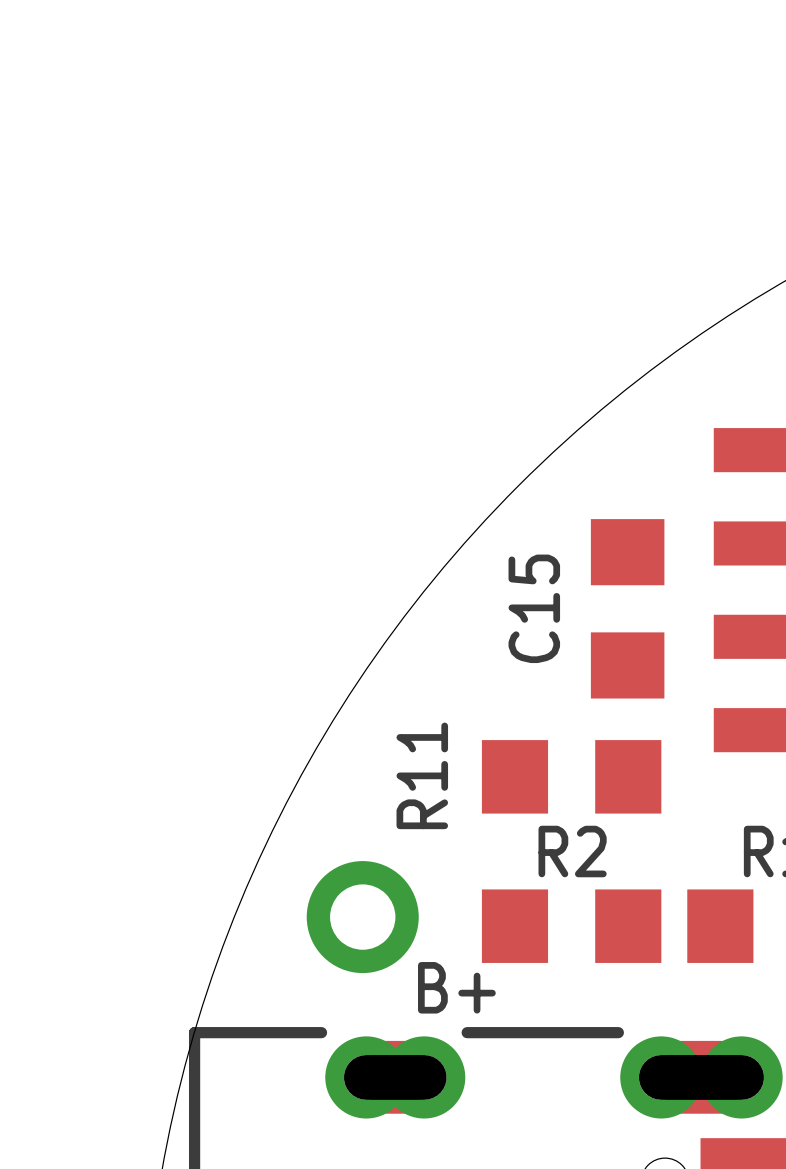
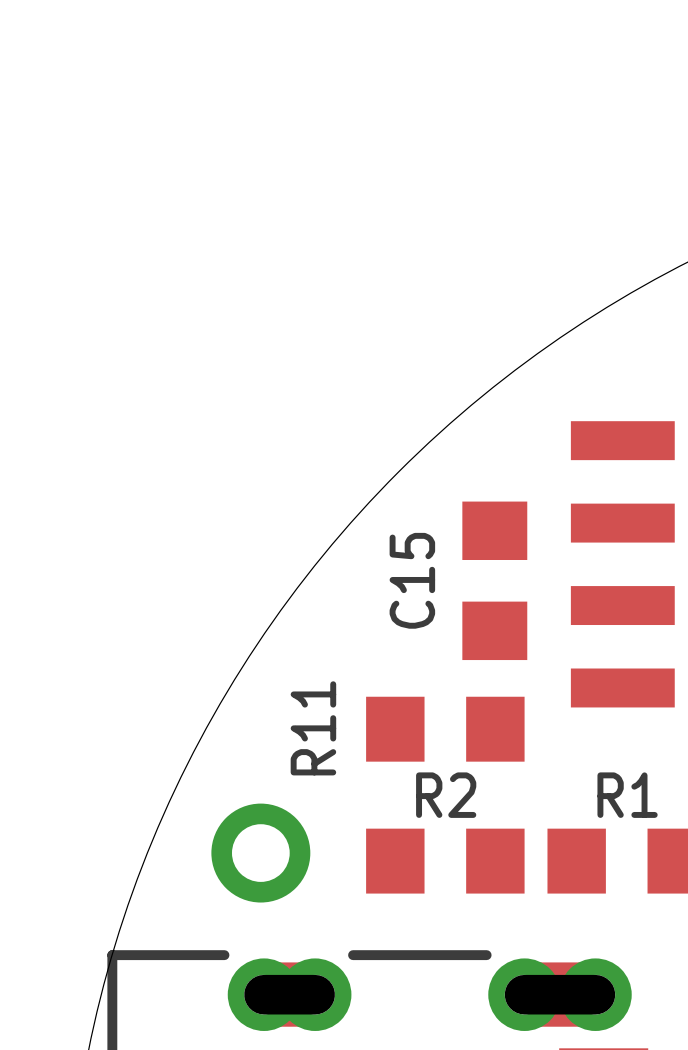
text: B+ (456, 987) -> none

